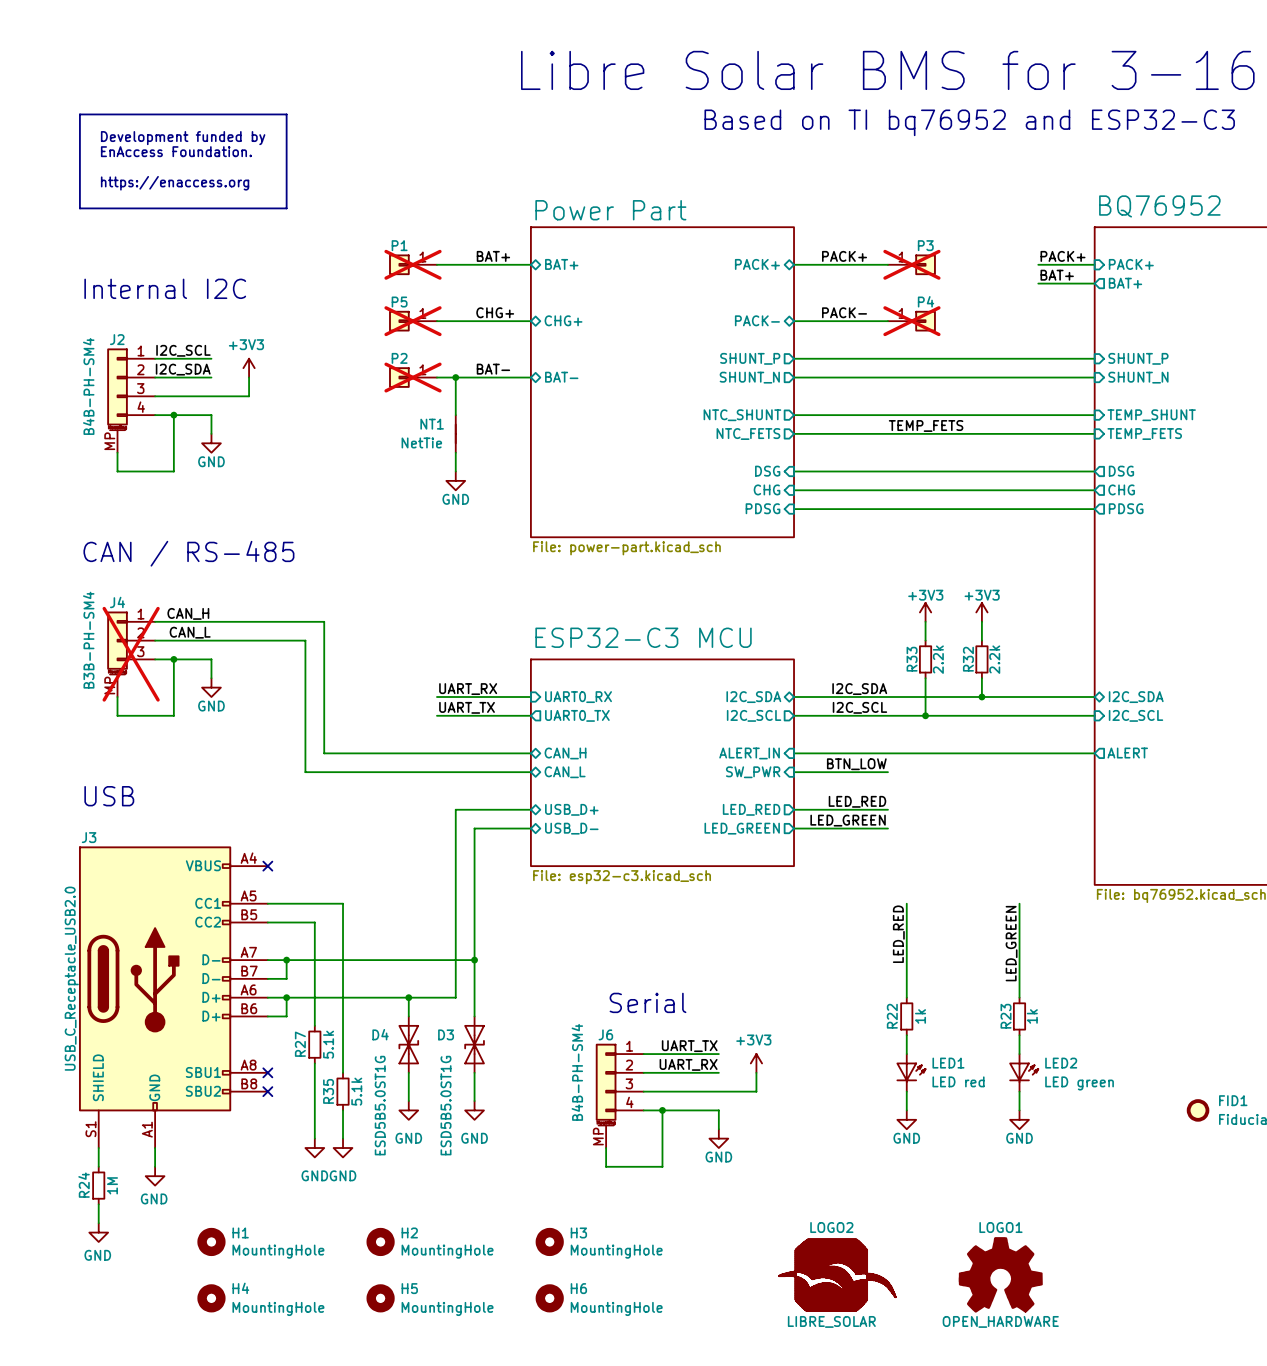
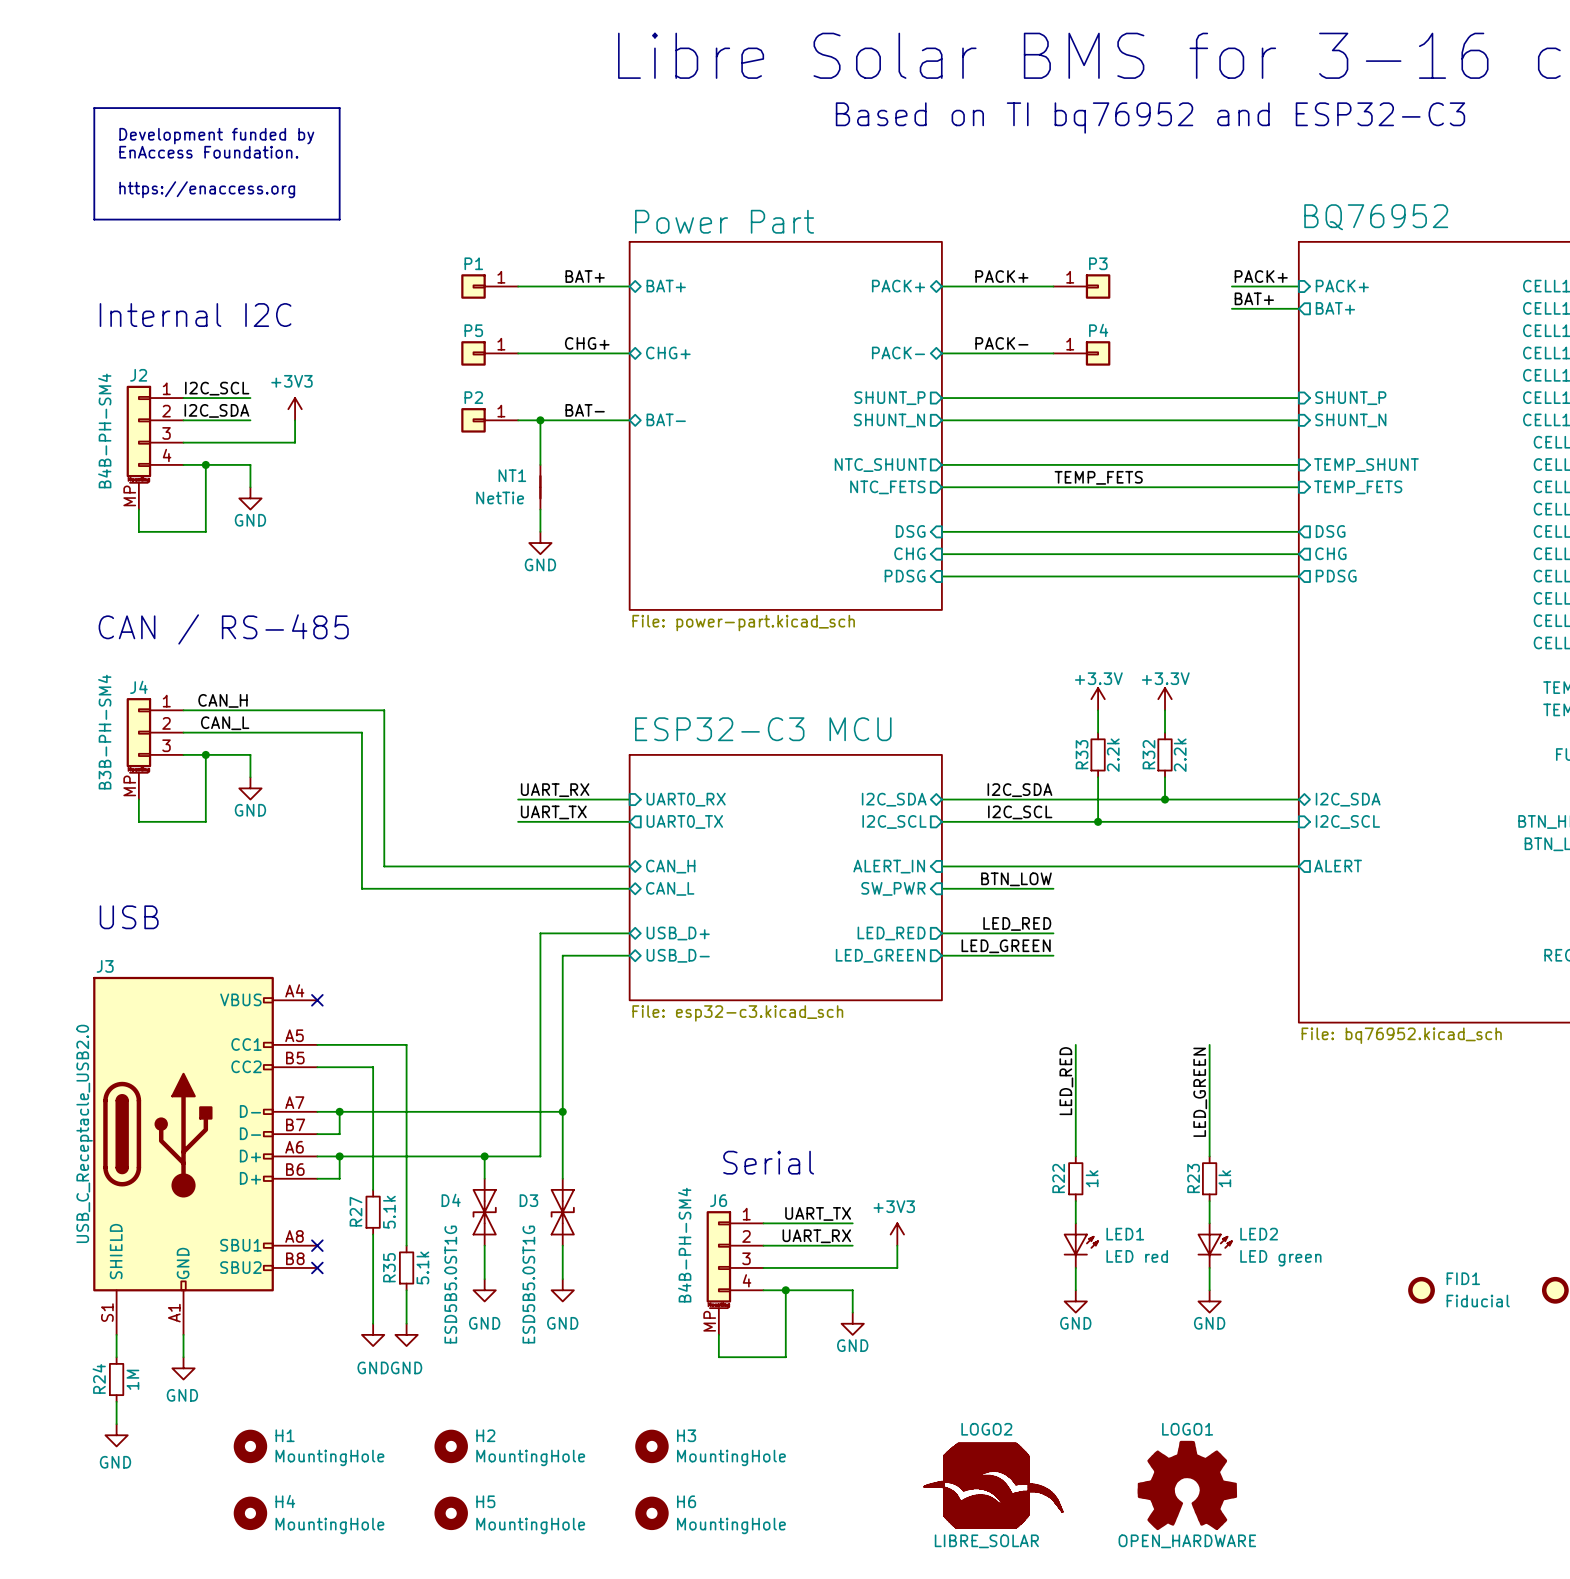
P1 do-not-place cross: (413, 264) -> none
P3 do-not-place cross: (911, 264) -> none
P5 do-not-place cross: (413, 321) -> none
P4 do-not-place cross: (911, 321) -> none
P2 do-not-place cross: (413, 377) -> none
power symbol: +3V3 (925, 612) -> +3.3V (1098, 699)
power symbol: +3V3 (981, 612) -> +3.3V (1165, 699)
J4 do-not-place cross: (131, 654) -> none

